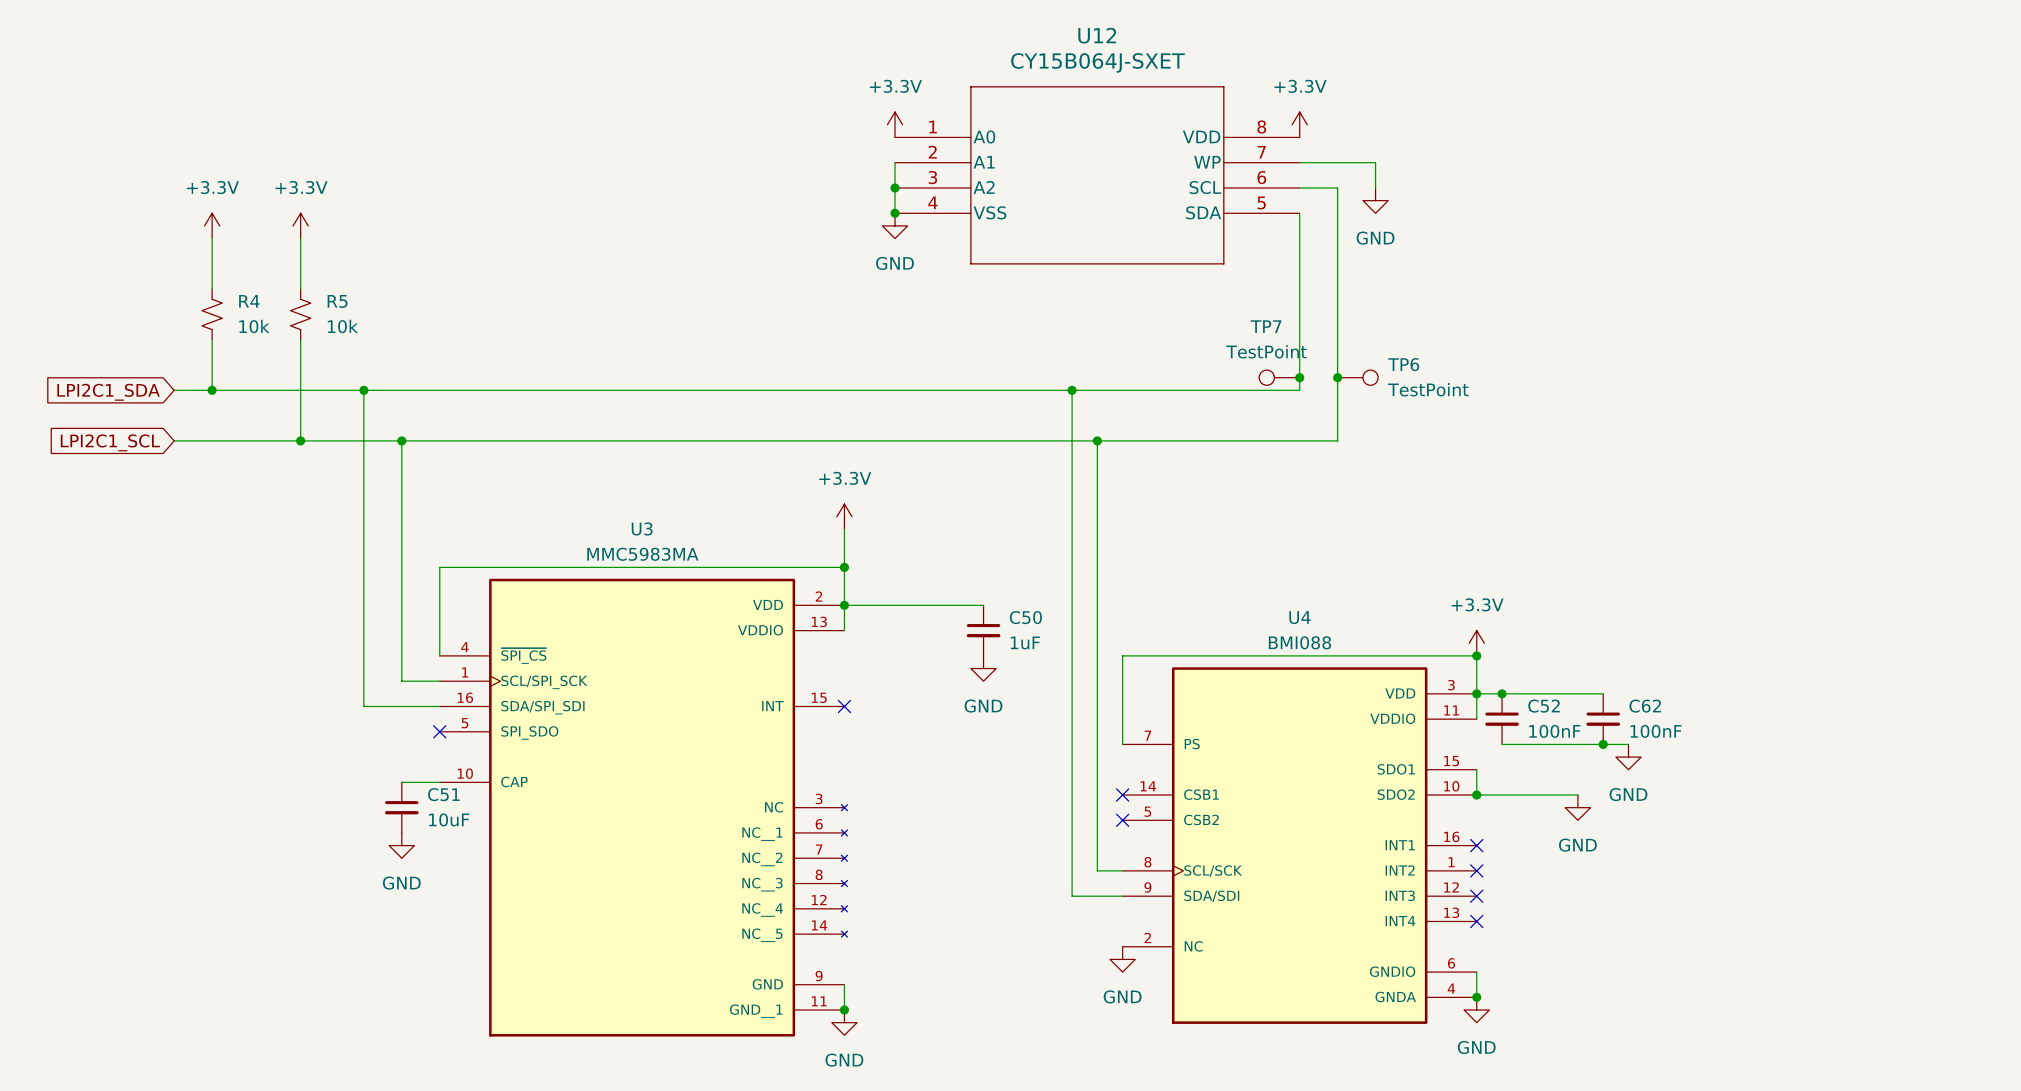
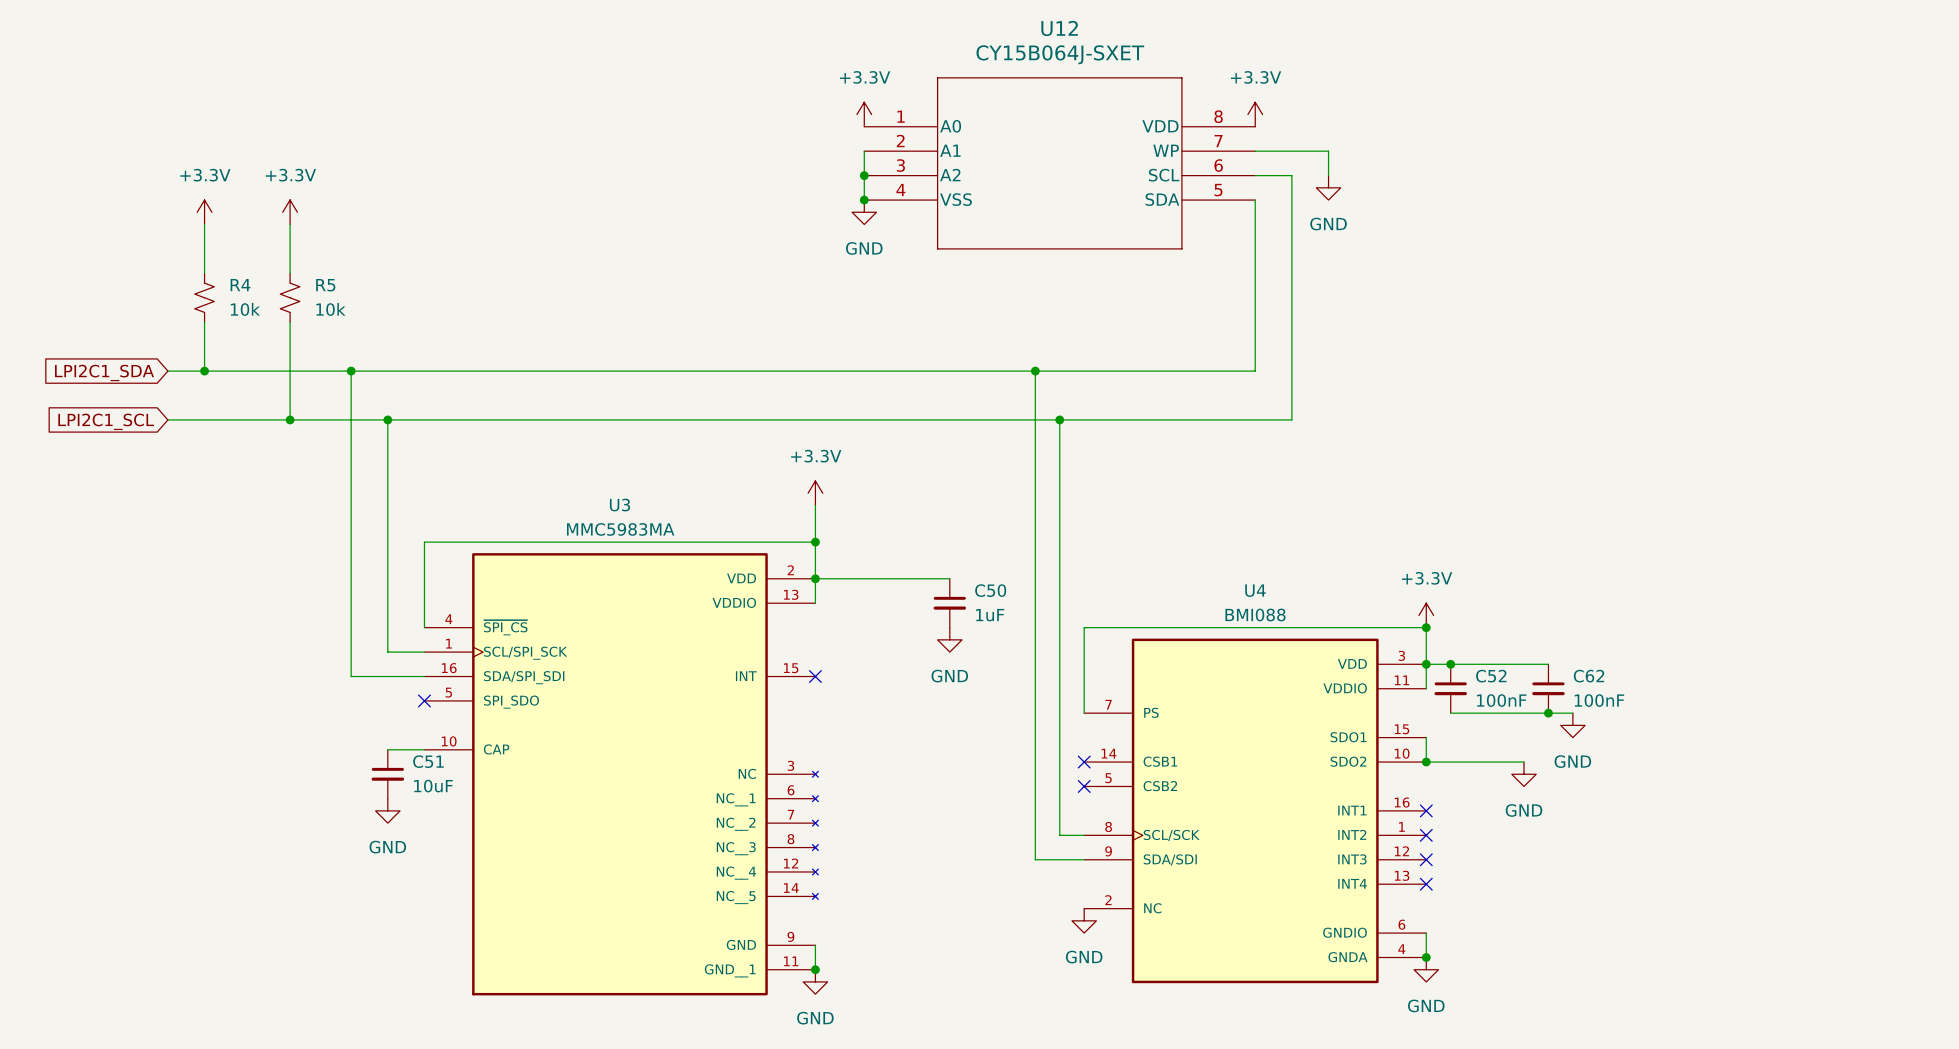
TP7: TestPoint (1279, 377) -> none
junction: (1299, 377) -> none
junction: (1337, 377) -> none
TP6: TestPoint (1357, 377) -> none

